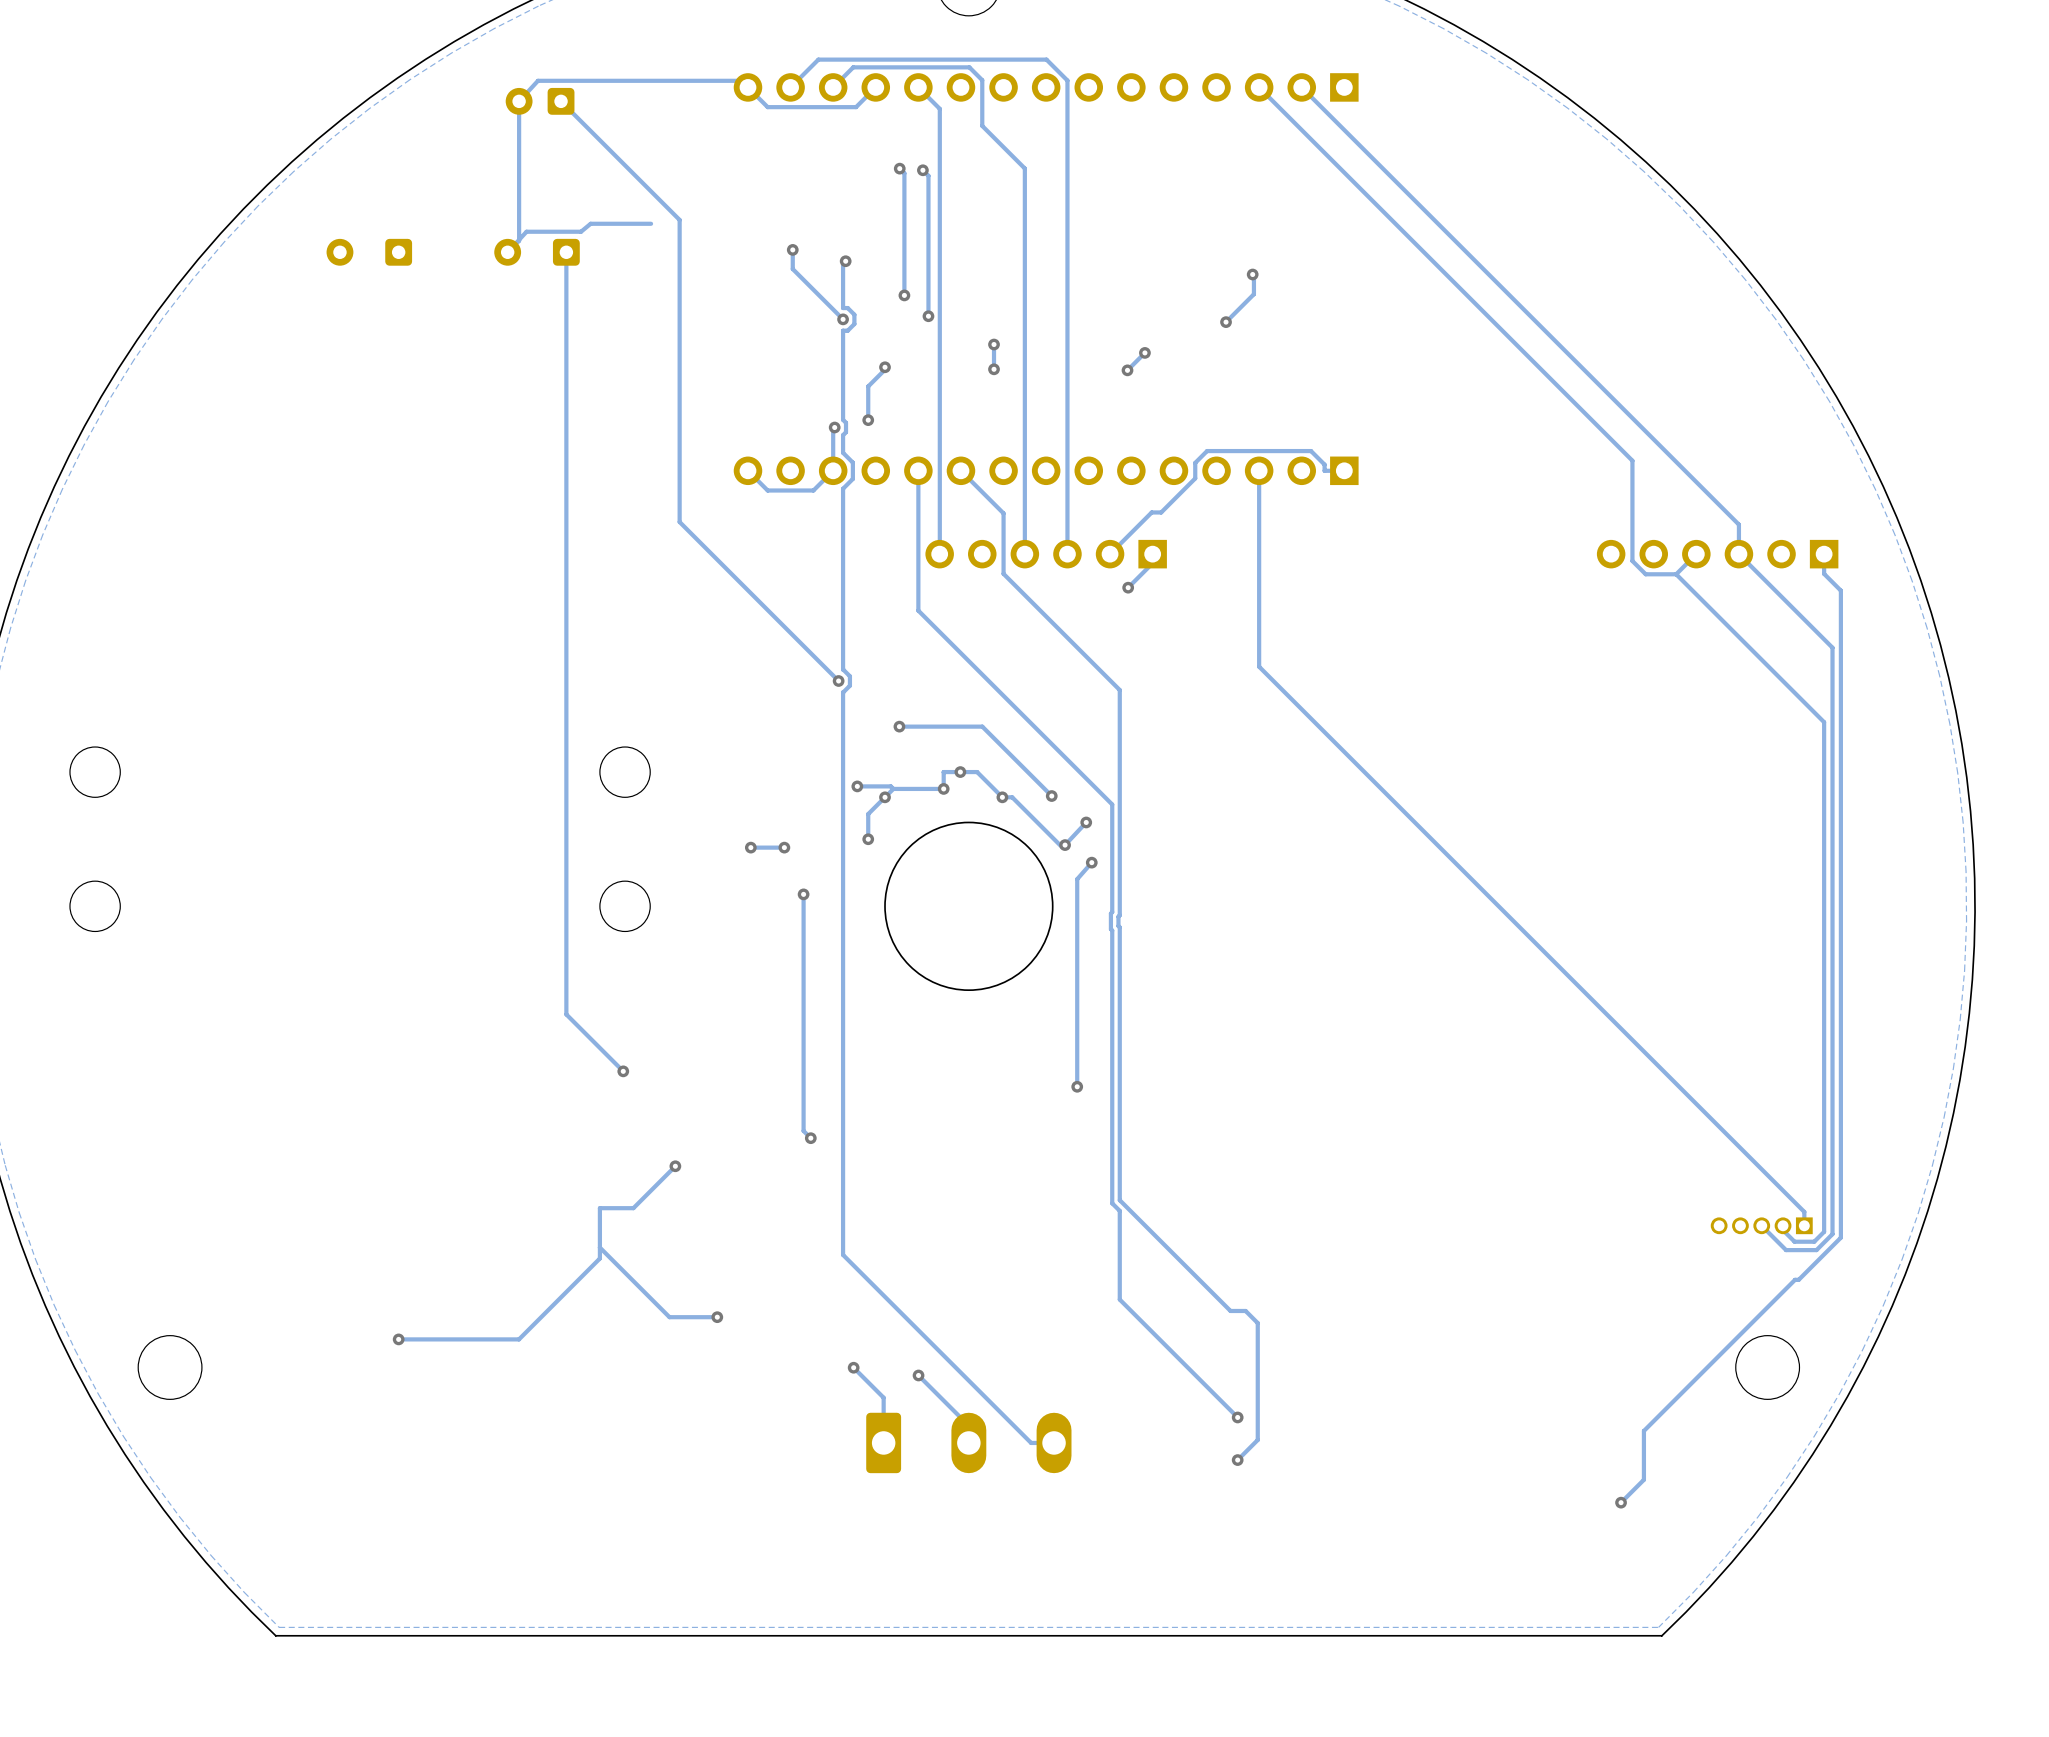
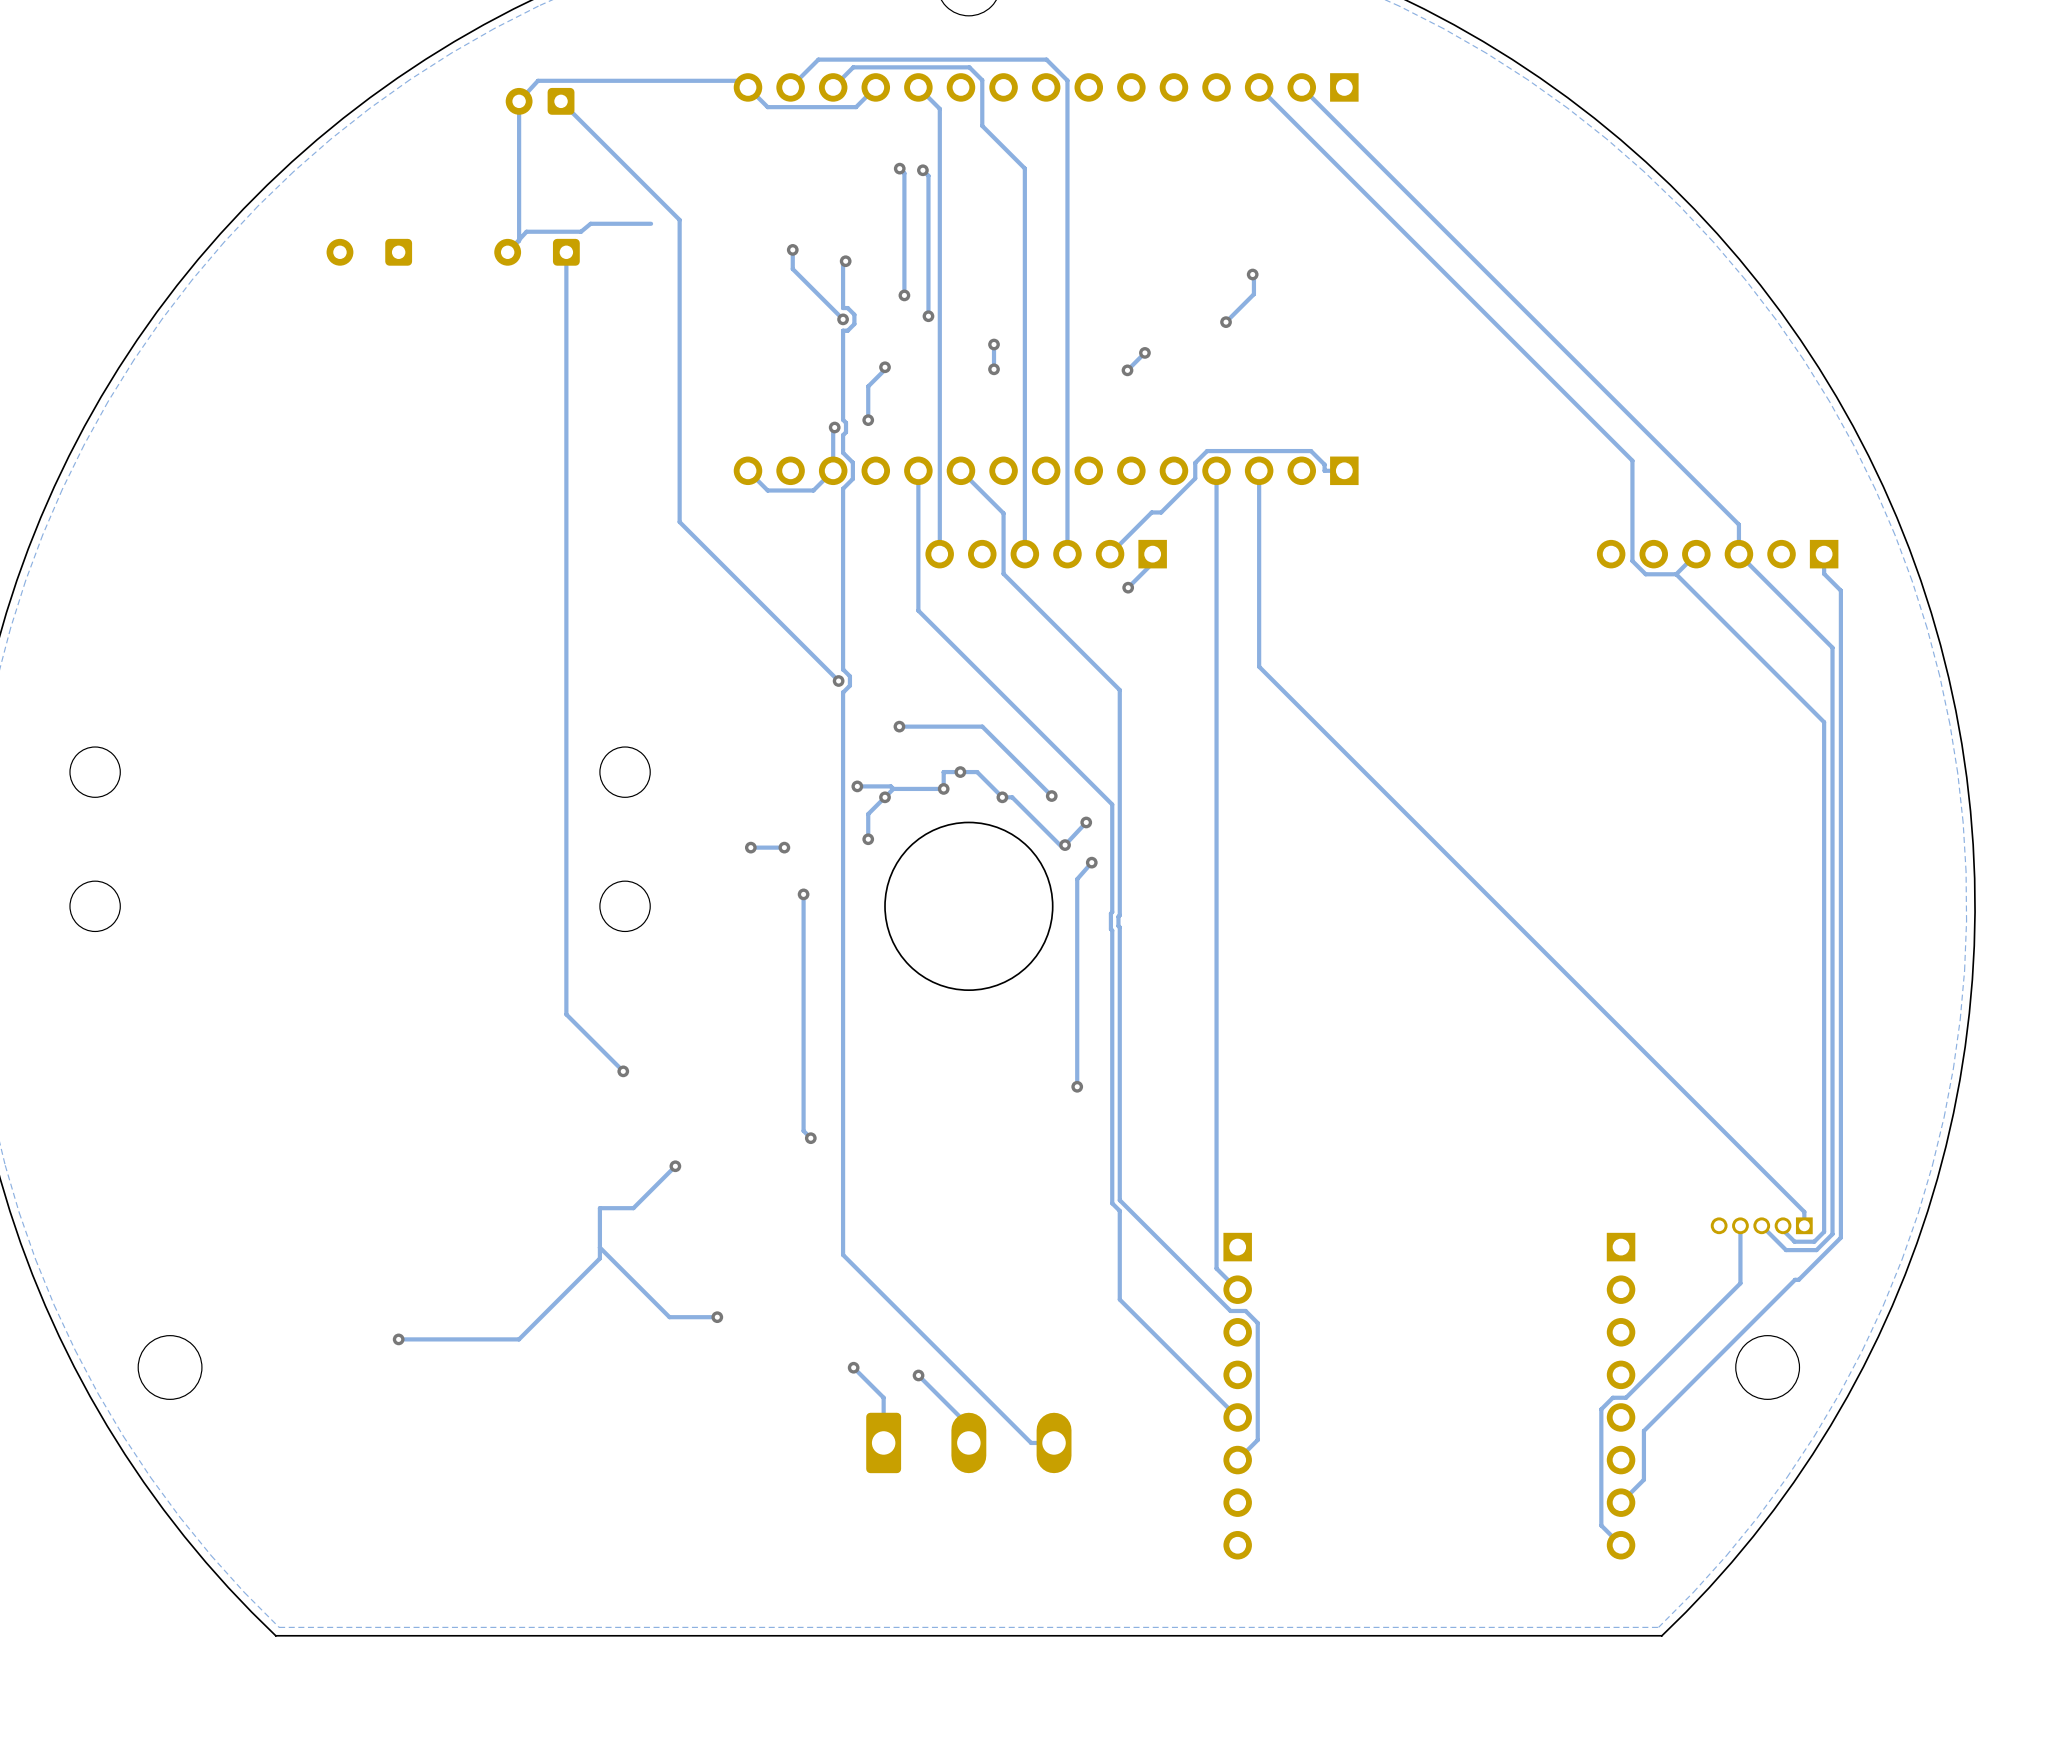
track: none -> (1216, 470) (1216, 1268) (1237, 1289)
track: none -> (1740, 1225) (1740, 1283) (1626, 1397) (1612, 1397) (1601, 1409) (1601, 1525) (1621, 1545)
part: none -> (1237, 1396)
part: none -> (1621, 1396)
via: (1237, 1417) -> none
via: (1237, 1460) -> none
via: (1621, 1502) -> none

